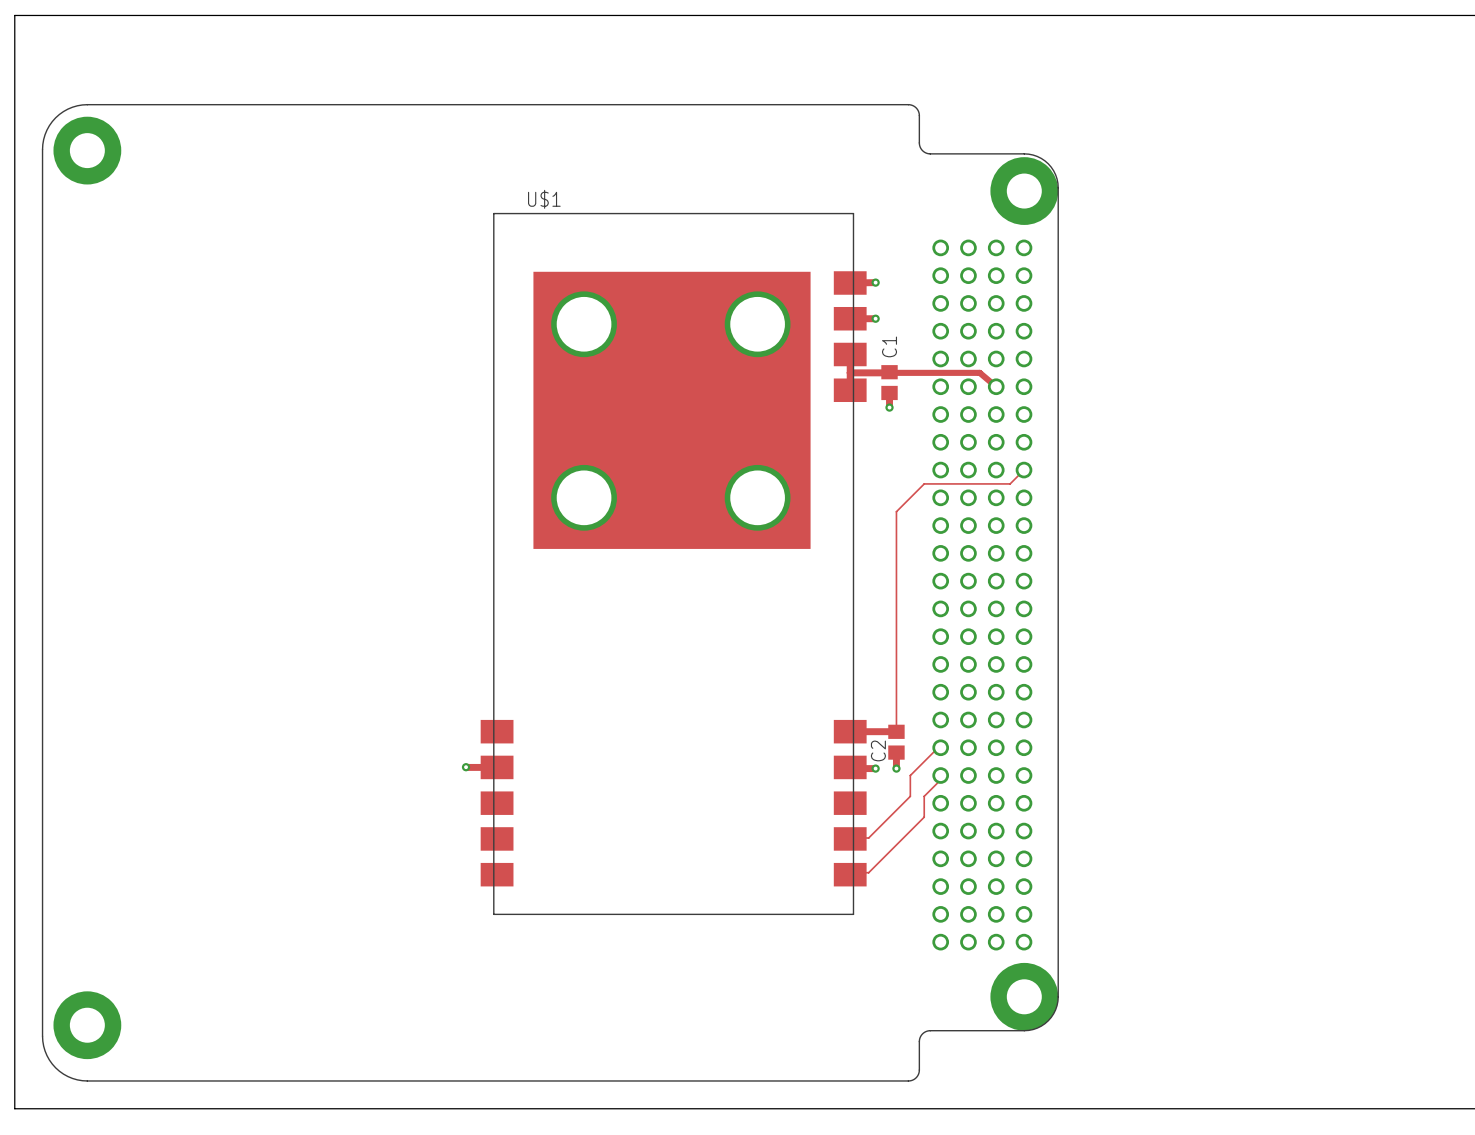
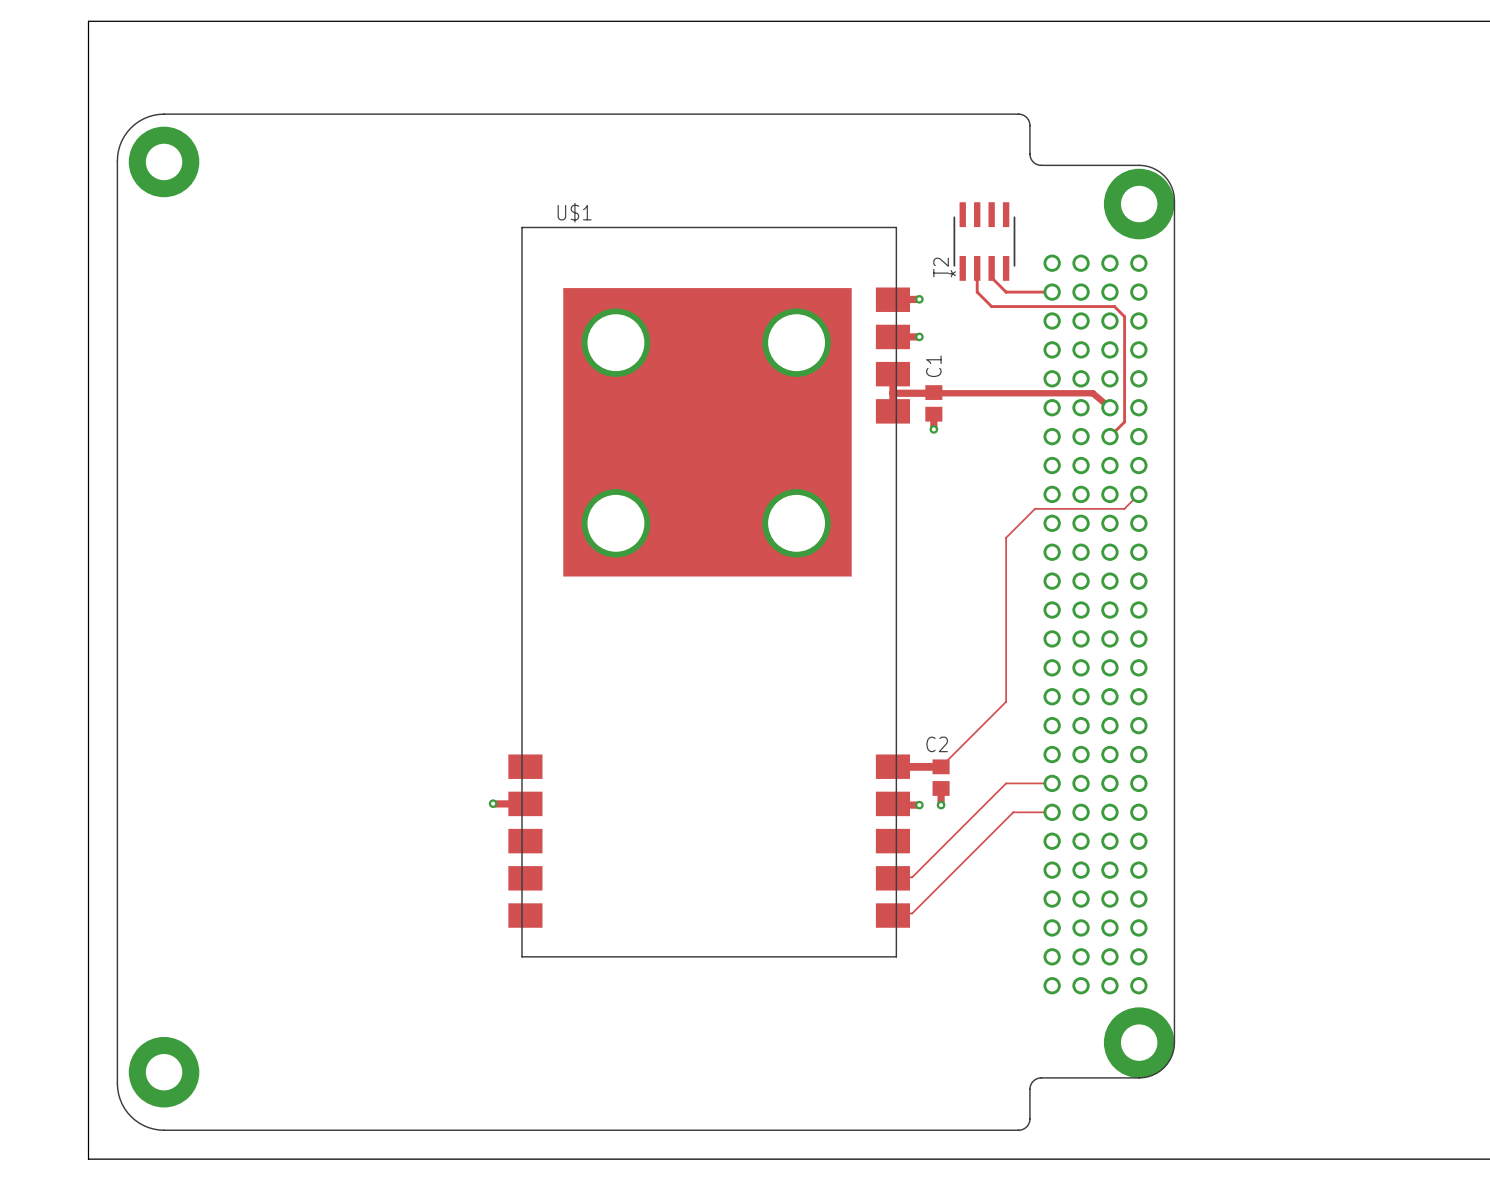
board edge: (77, 15) (14, 15) (14, 1108) (77, 1108) -> (88, 21) (88, 1159)
T2: none -> (984, 241)
track: none -> (977, 268) (977, 292) (991, 306) (1114, 306) (1124, 316) (1124, 421) (1109, 436)
track: none -> (991, 268) (991, 277) (1006, 292) (1052, 292)
track: (979, 372) (996, 386) -> (1027, 393) (1092, 393) (1109, 407)
track: (1024, 470) (1010, 483) -> (1138, 494) (1124, 508) (1059, 508)
track: (986, 483) (924, 483) (896, 511) (896, 731) -> (1035, 508) (1006, 537) (1006, 701) (941, 766) (893, 766)
part position: (550, 592) -> (645, 622)
track: (940, 747) (938, 747) (910, 775) (910, 796) -> (1052, 783) (1006, 783) (955, 834)
C2 name rotation: 0° (878, 750) -> 90° clockwise (937, 744)
C2 name position: C2 (878, 750) -> C2 (937, 744)
track: (940, 775) (940, 779) (924, 796) (924, 817) -> (1052, 812) (1013, 812) (969, 855)

